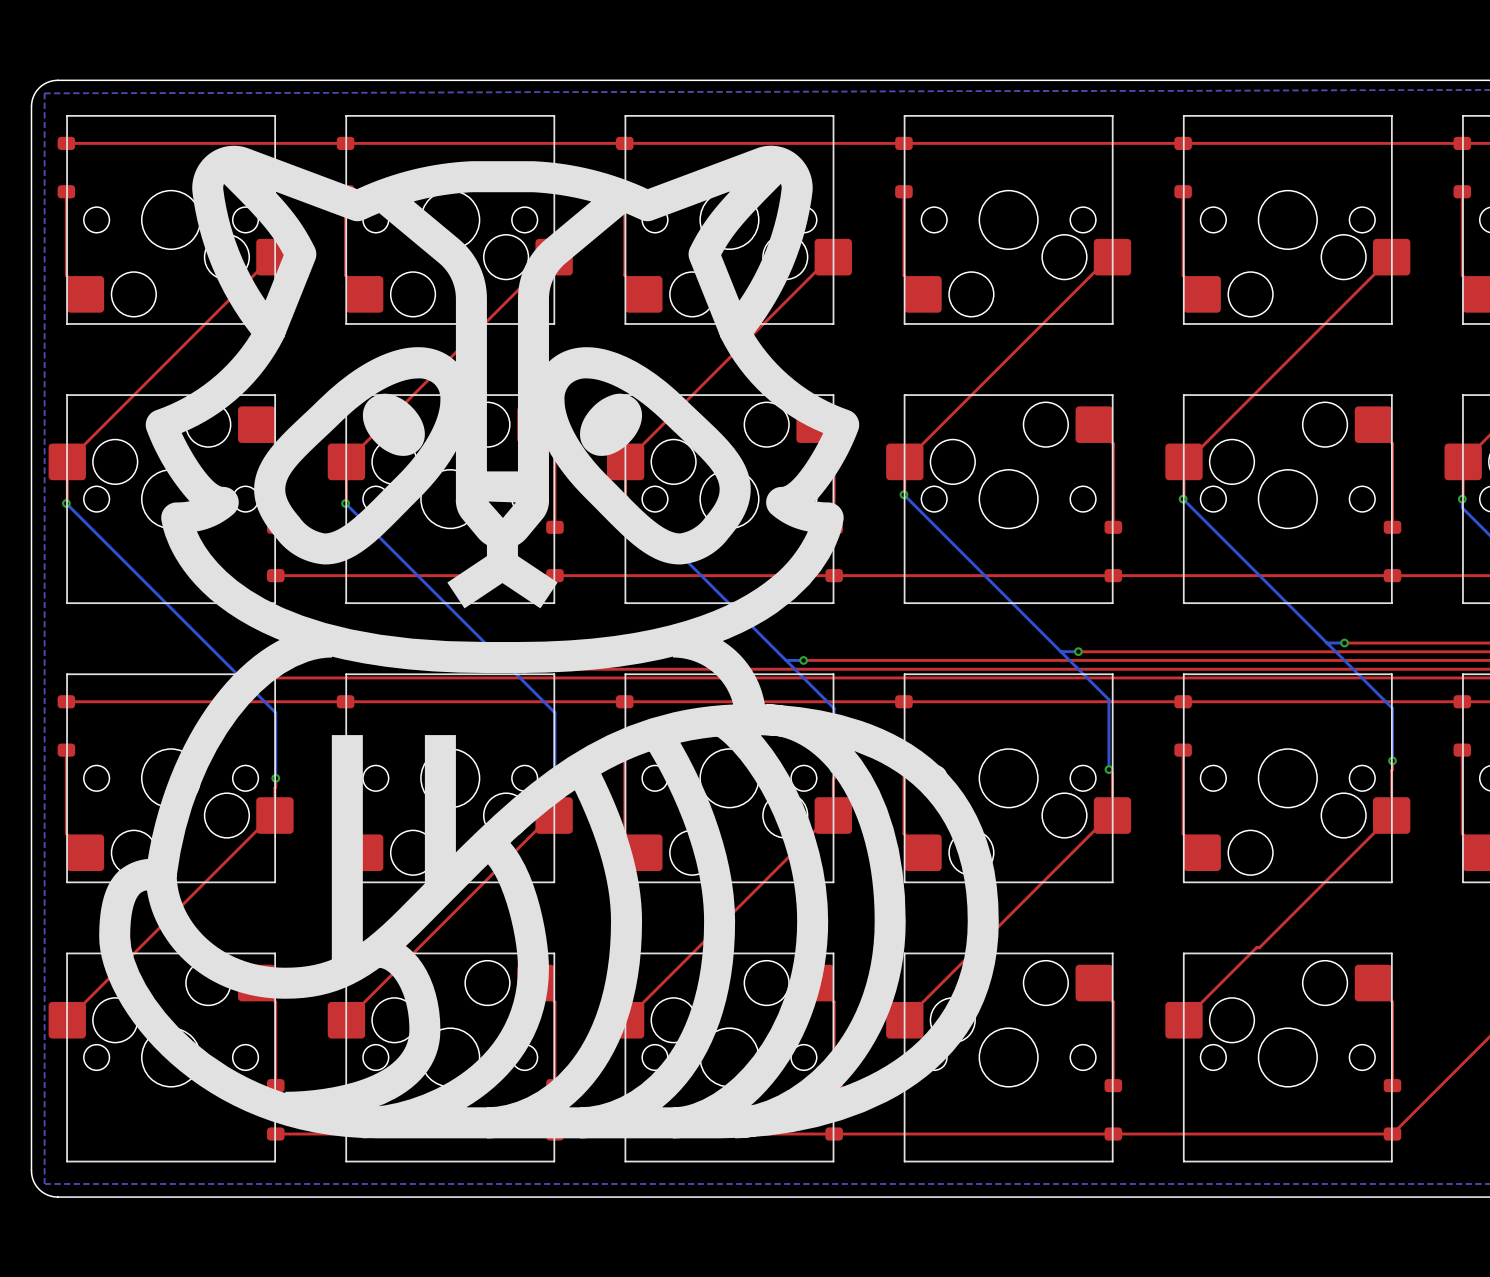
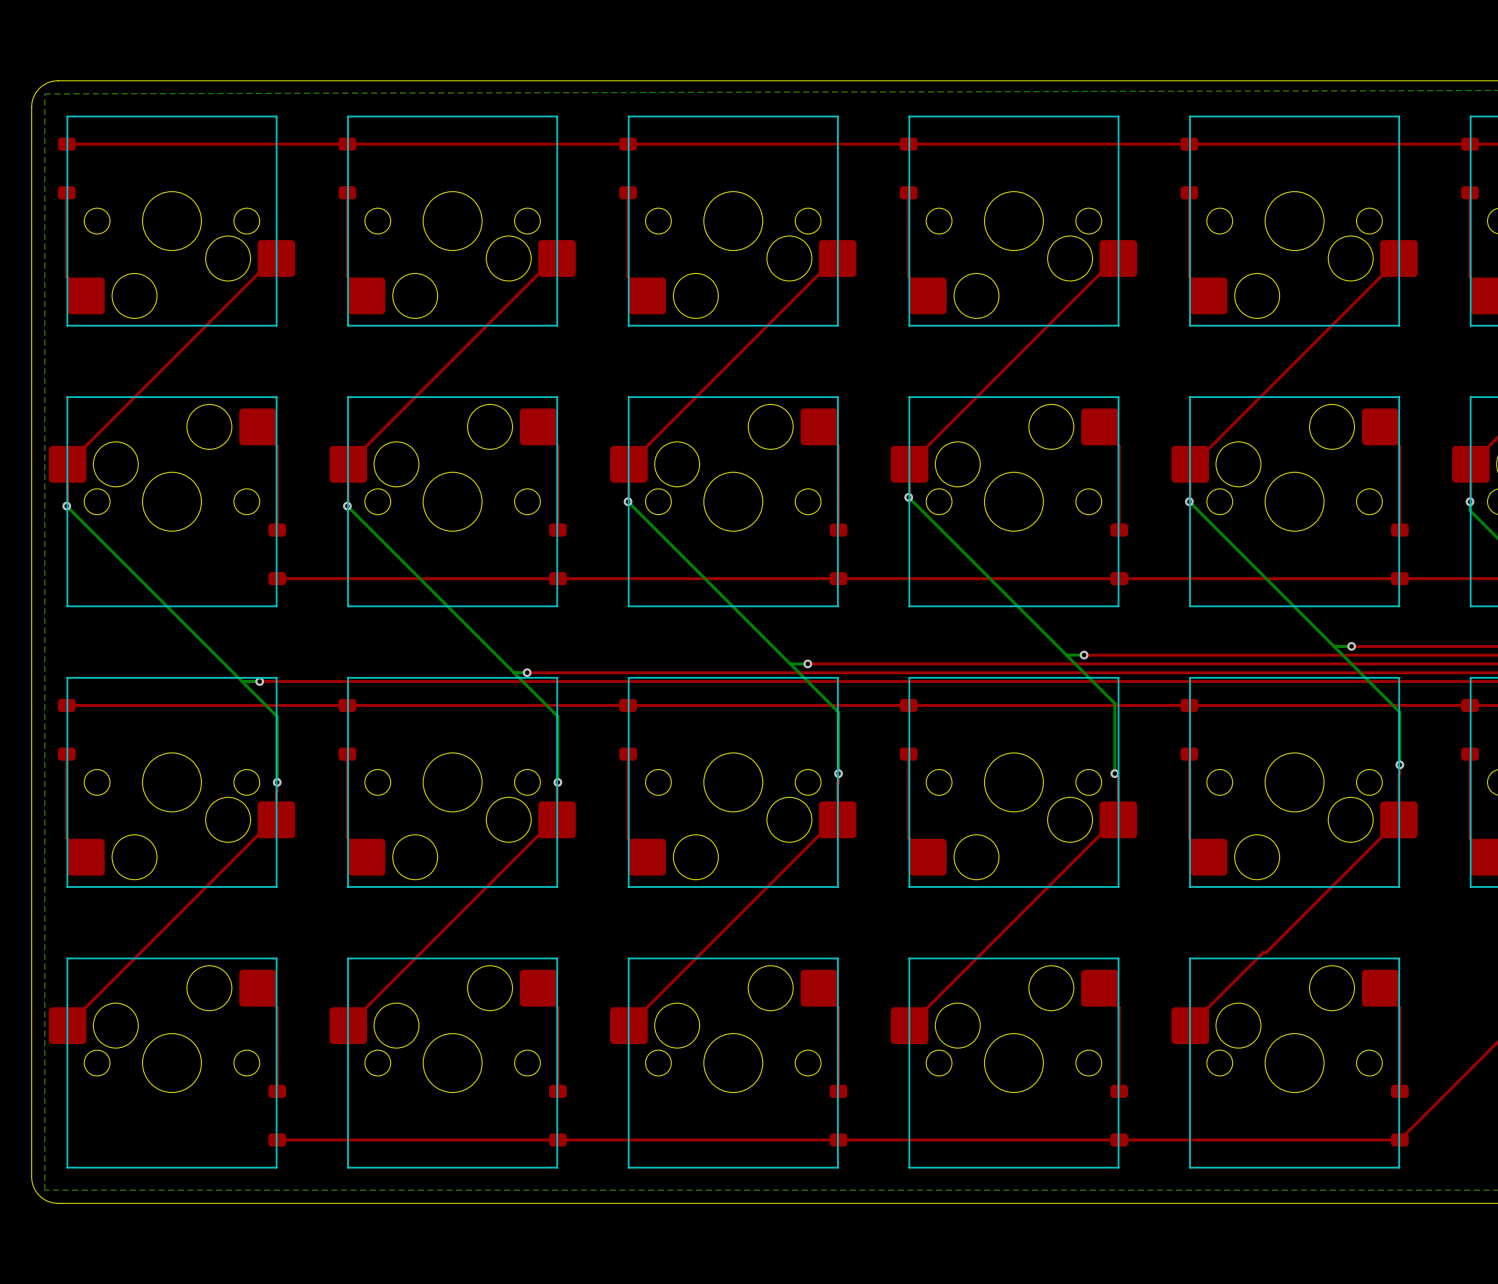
drawing: [99, 145, 999, 1139] -> none

